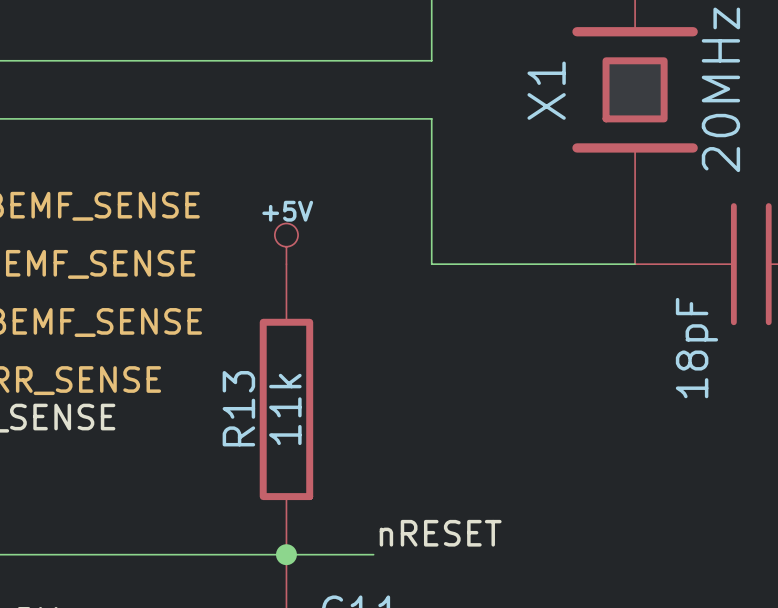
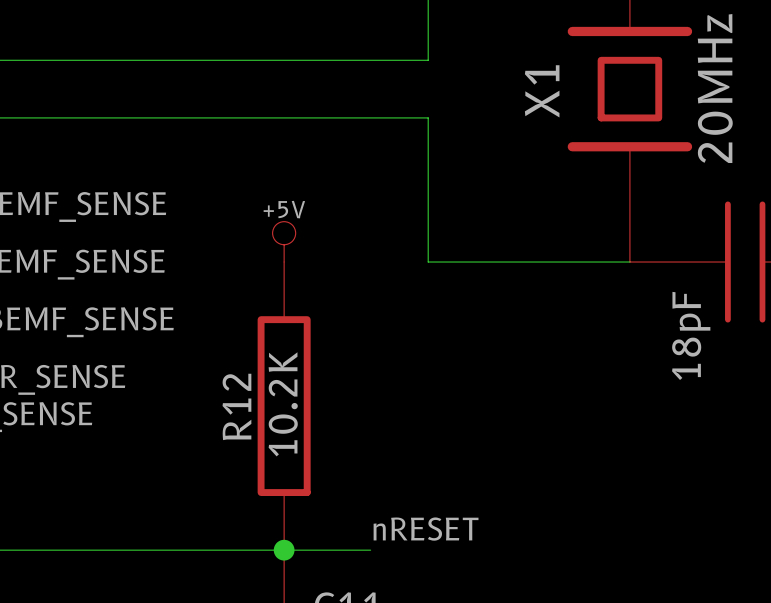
R13 name: R13 (238, 408) -> R12 (236, 406)
R13 value: 11k (285, 409) -> 10.2K (283, 404)

